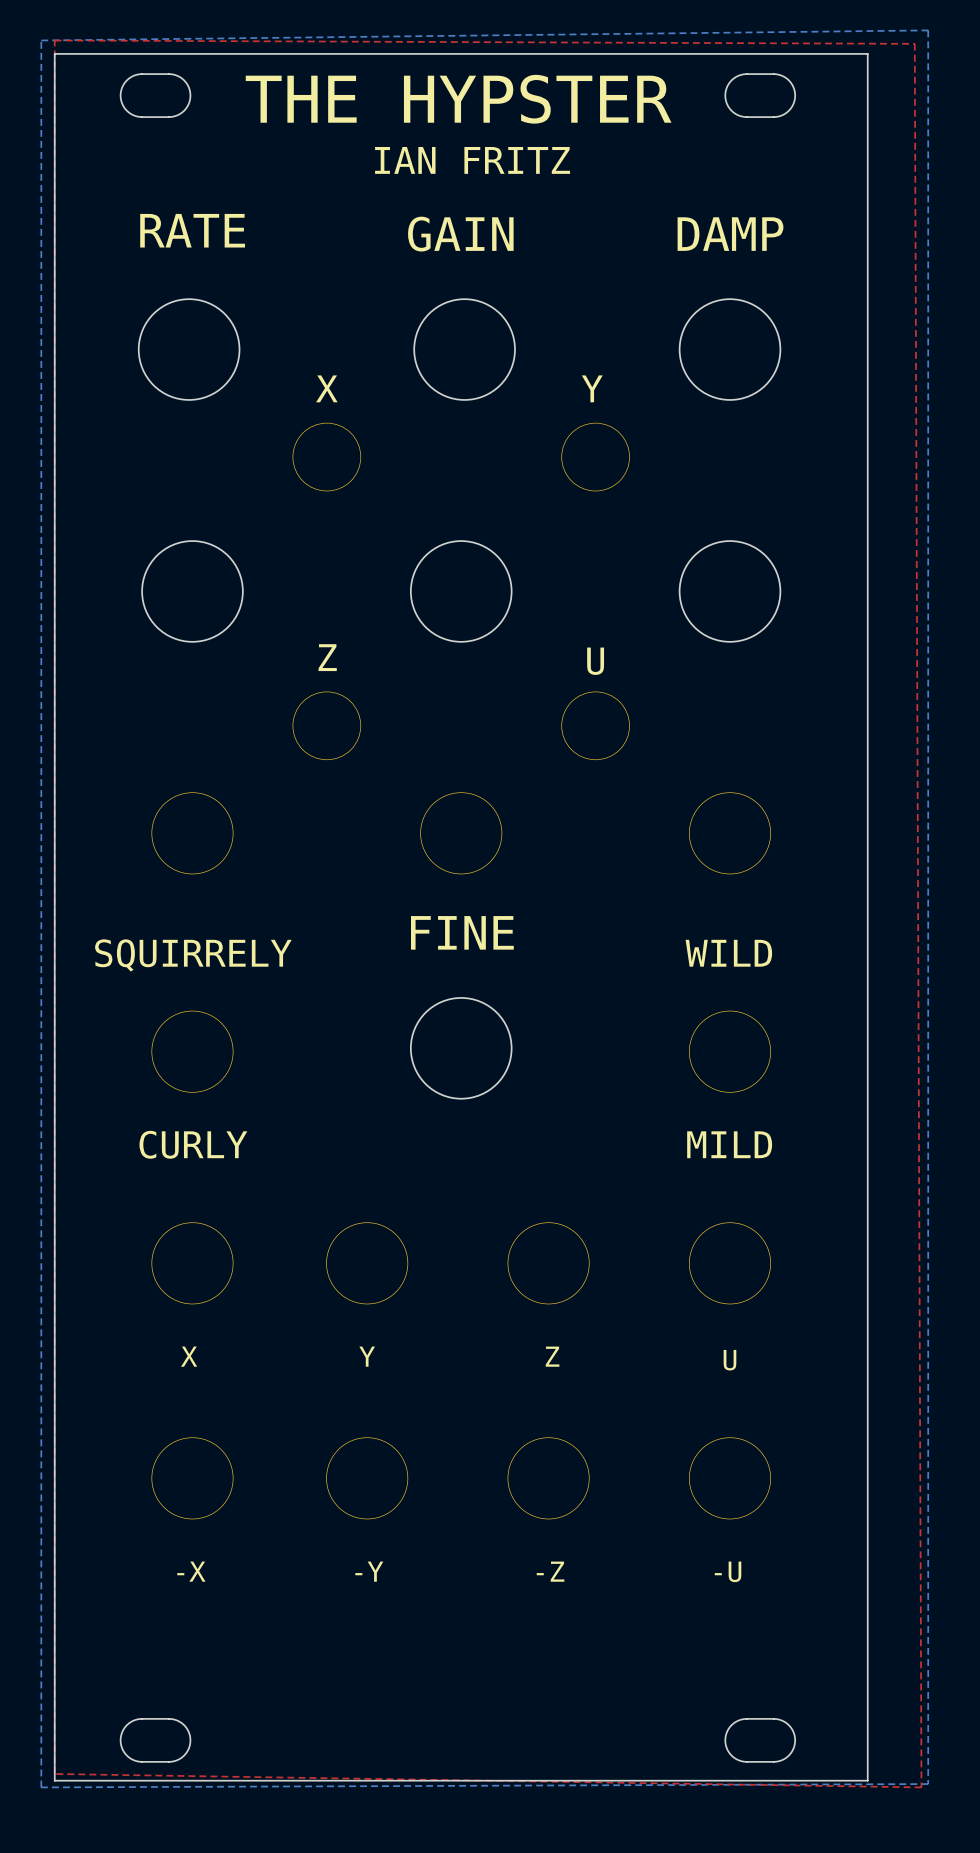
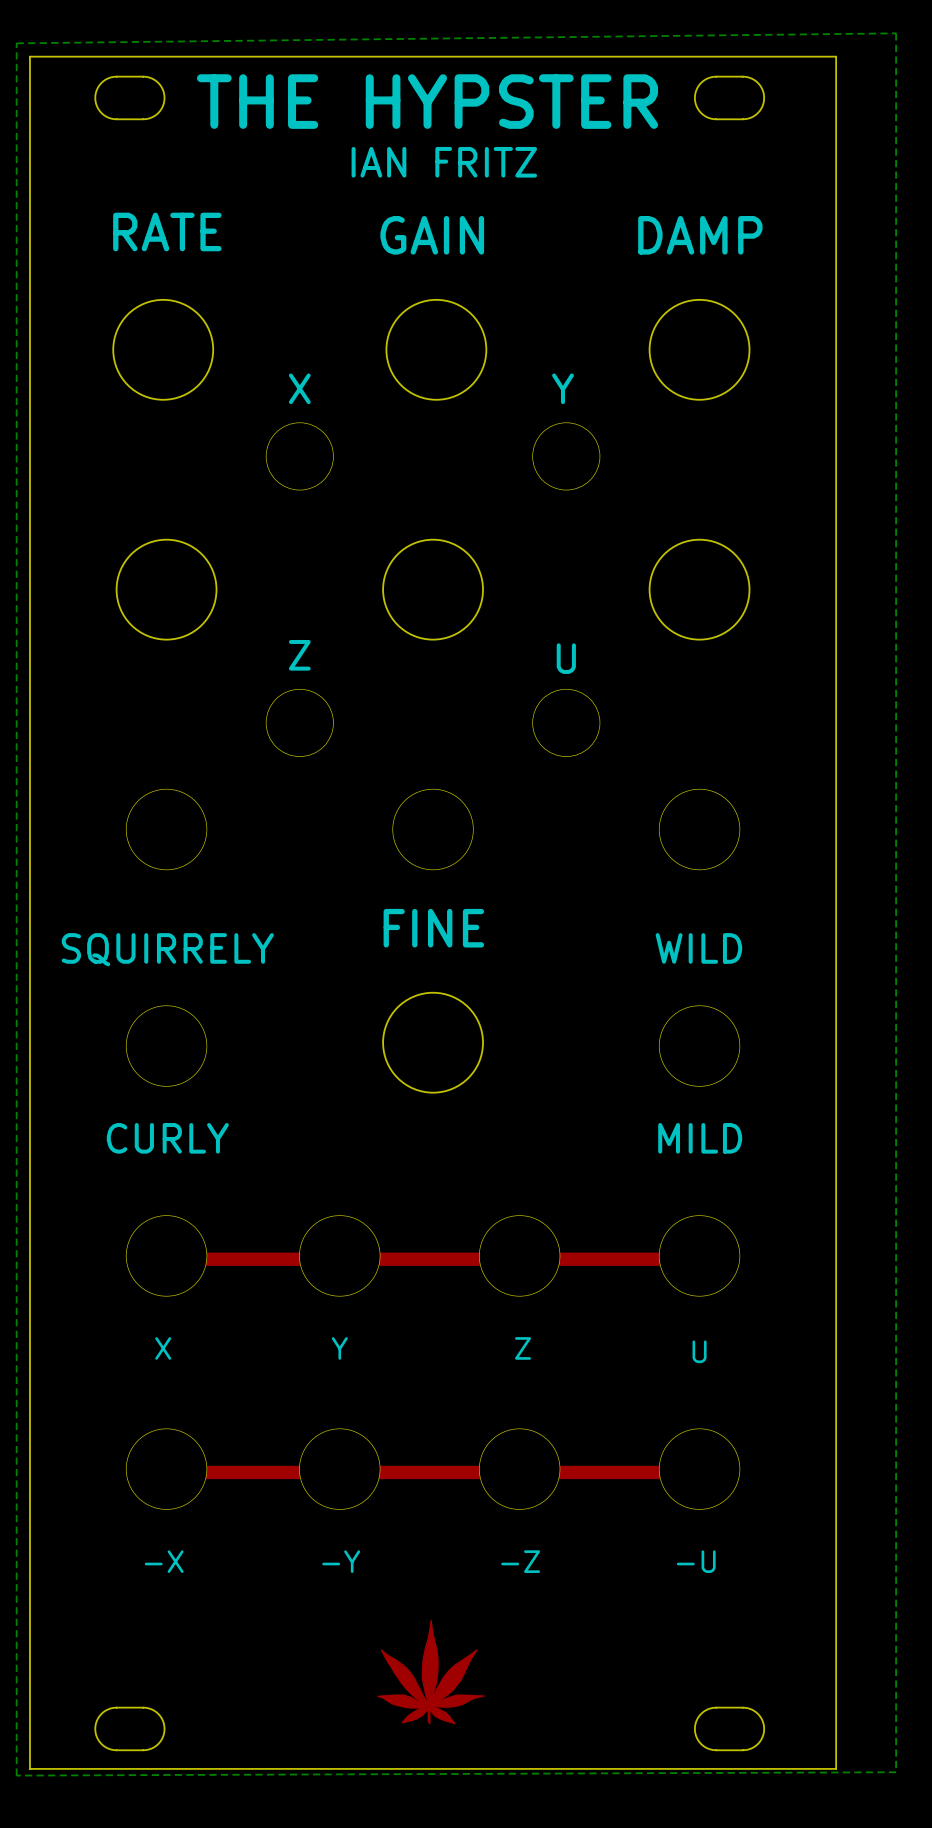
top zone outline: (54, 40) (54, 1773) (921, 1787) (914, 43) (54, 40) -> none
top track: none -> (166, 1259) (699, 1259)
top track: none -> (159, 1472) (692, 1472)
drawing: none -> [377, 1619, 485, 1725]

